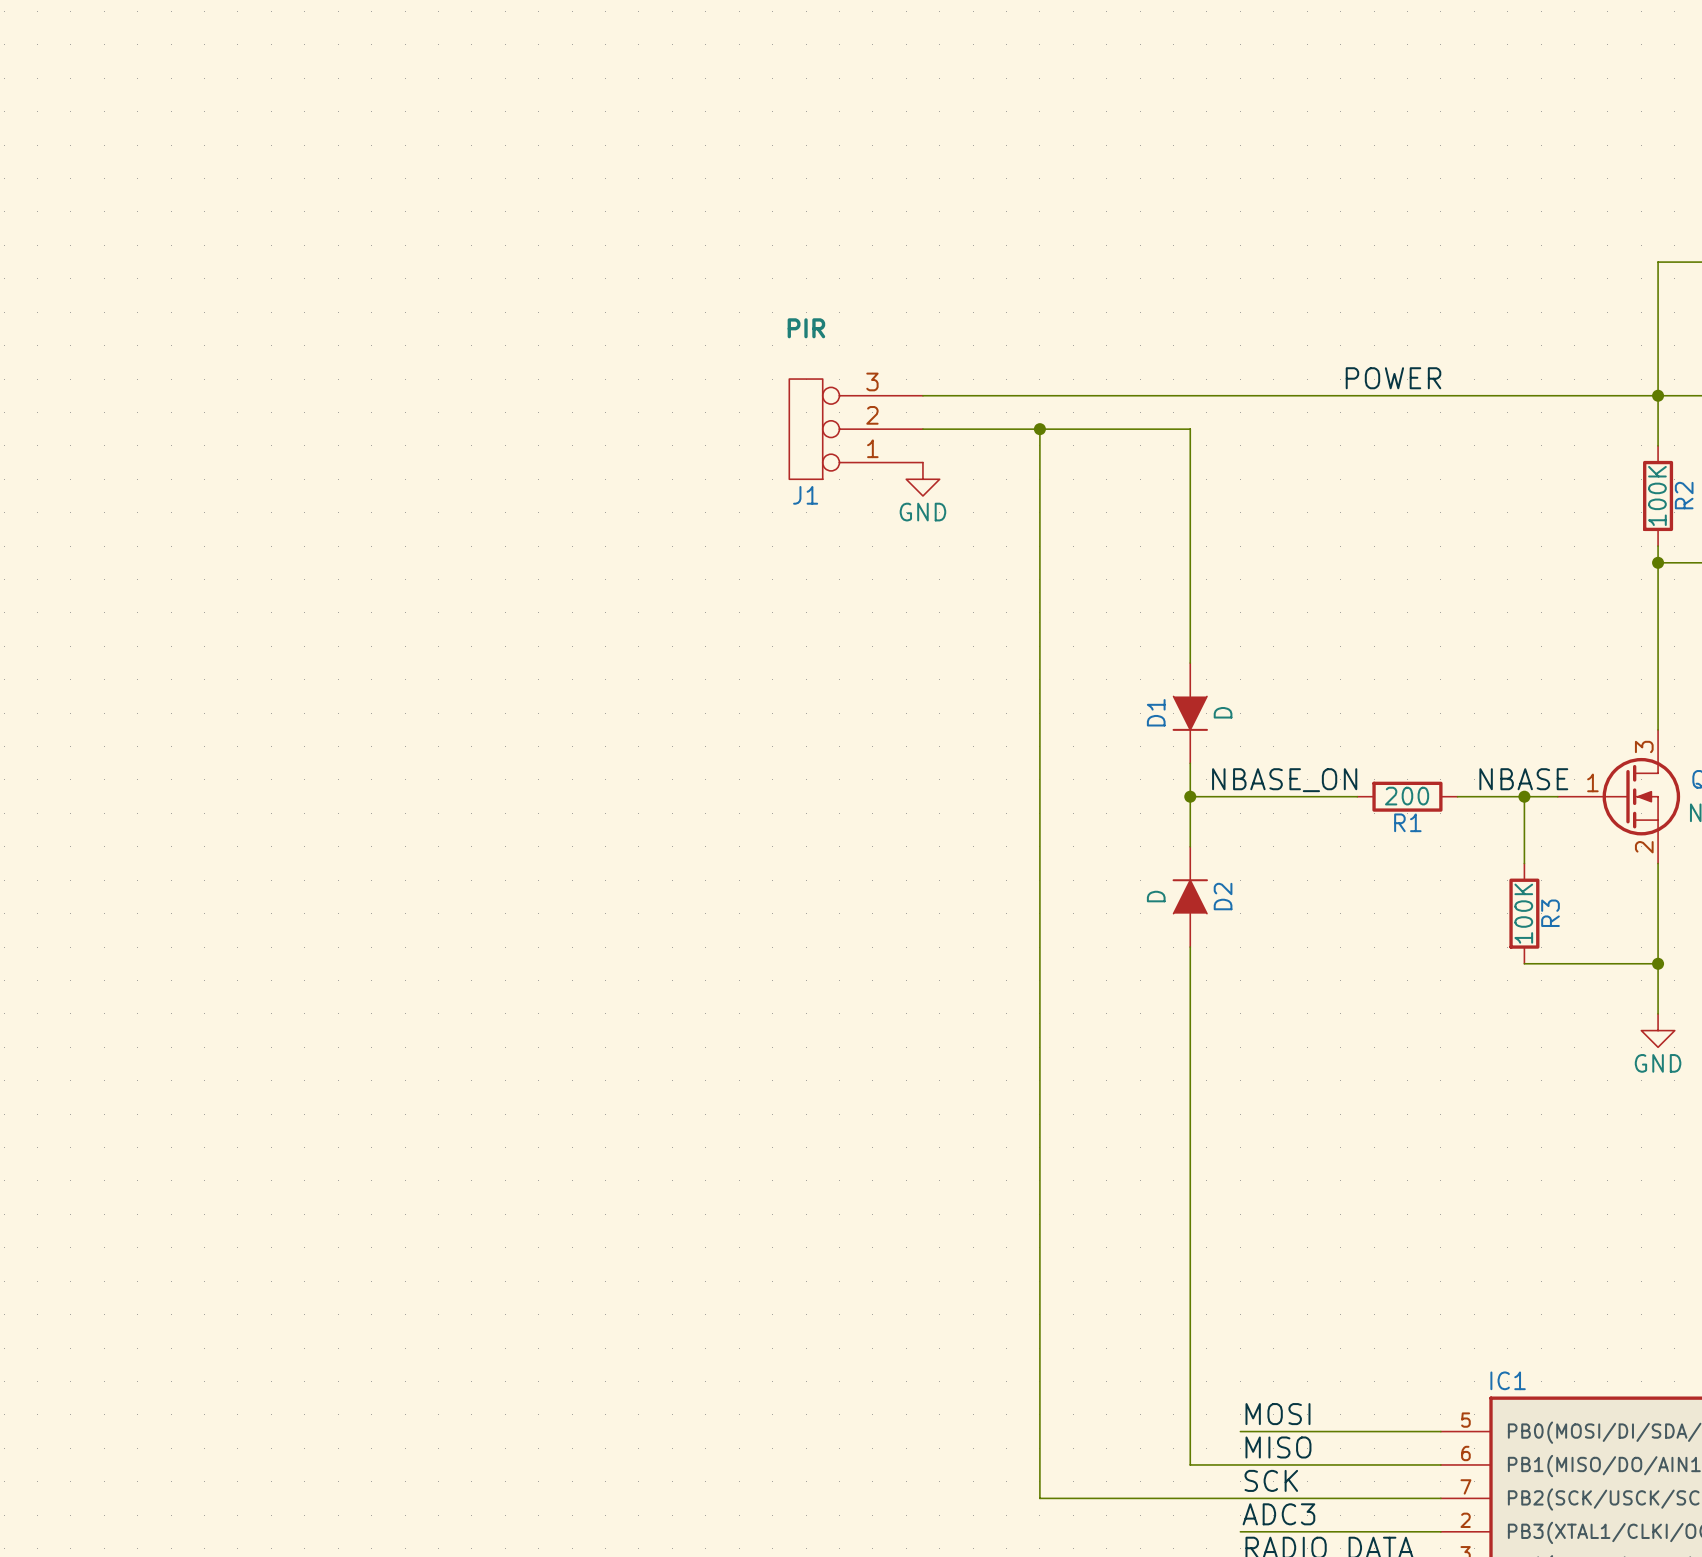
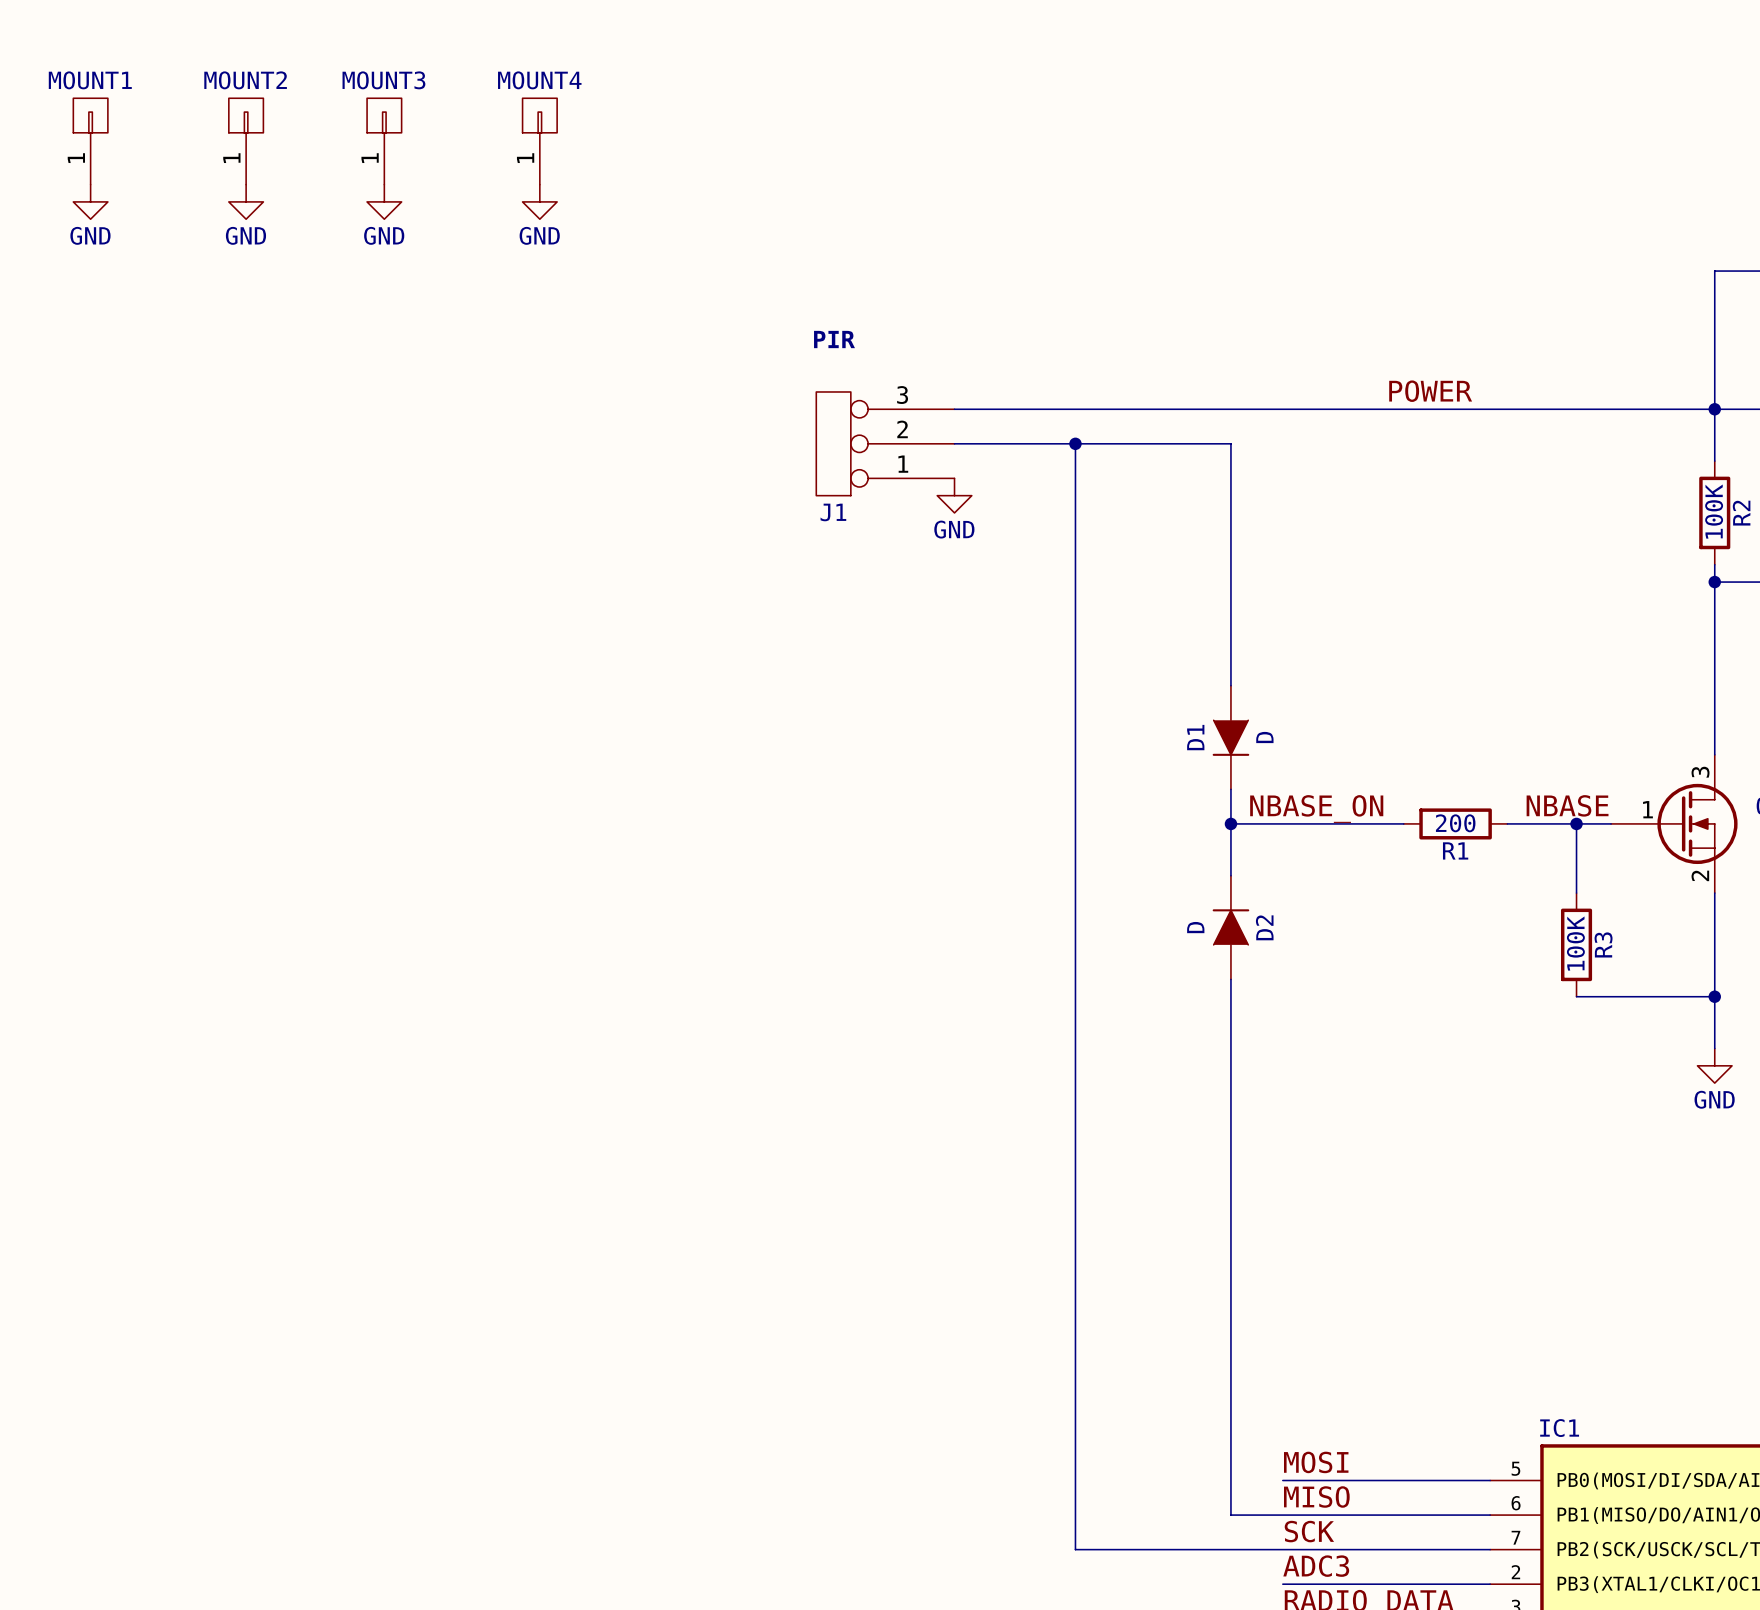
MOUNT1: none -> (90, 141)
MOUNT2: none -> (246, 141)
MOUNT3: none -> (384, 141)
MOUNT4: none -> (539, 141)
power symbol: none -> GND (90, 201)
power symbol: none -> GND (246, 201)
power symbol: none -> GND (384, 201)
power symbol: none -> GND (539, 201)

